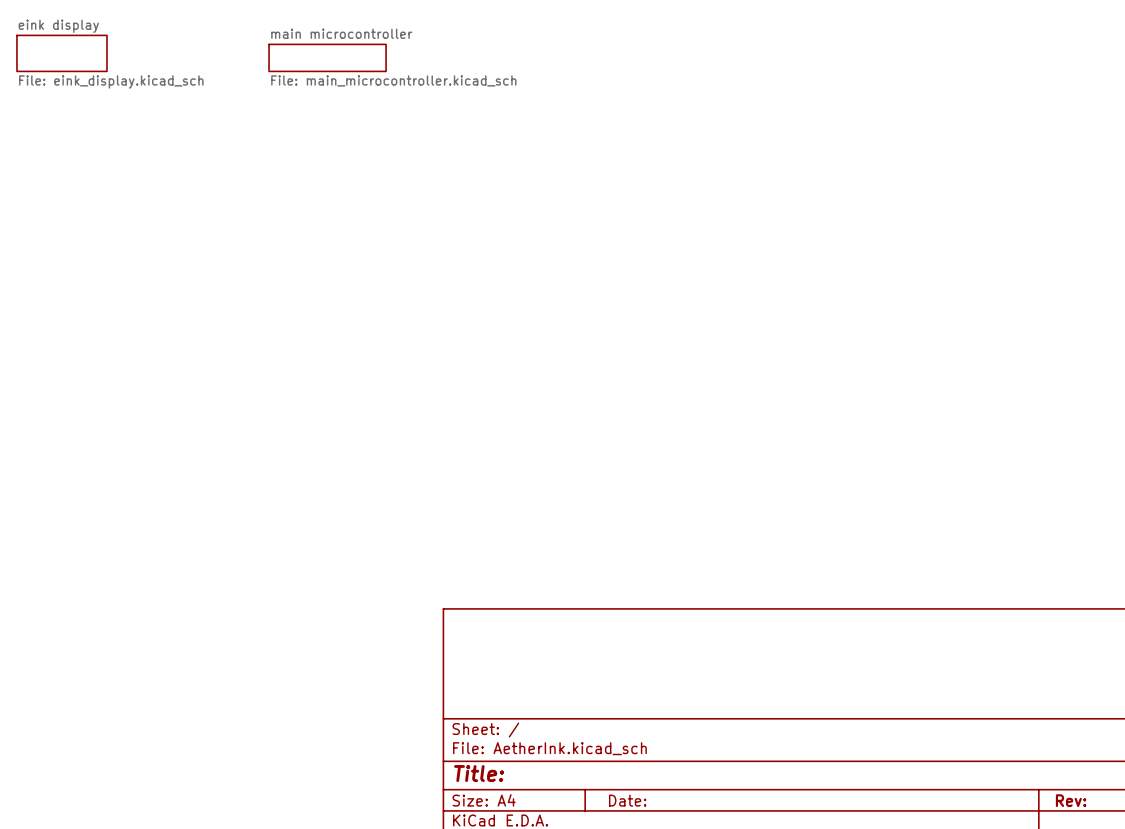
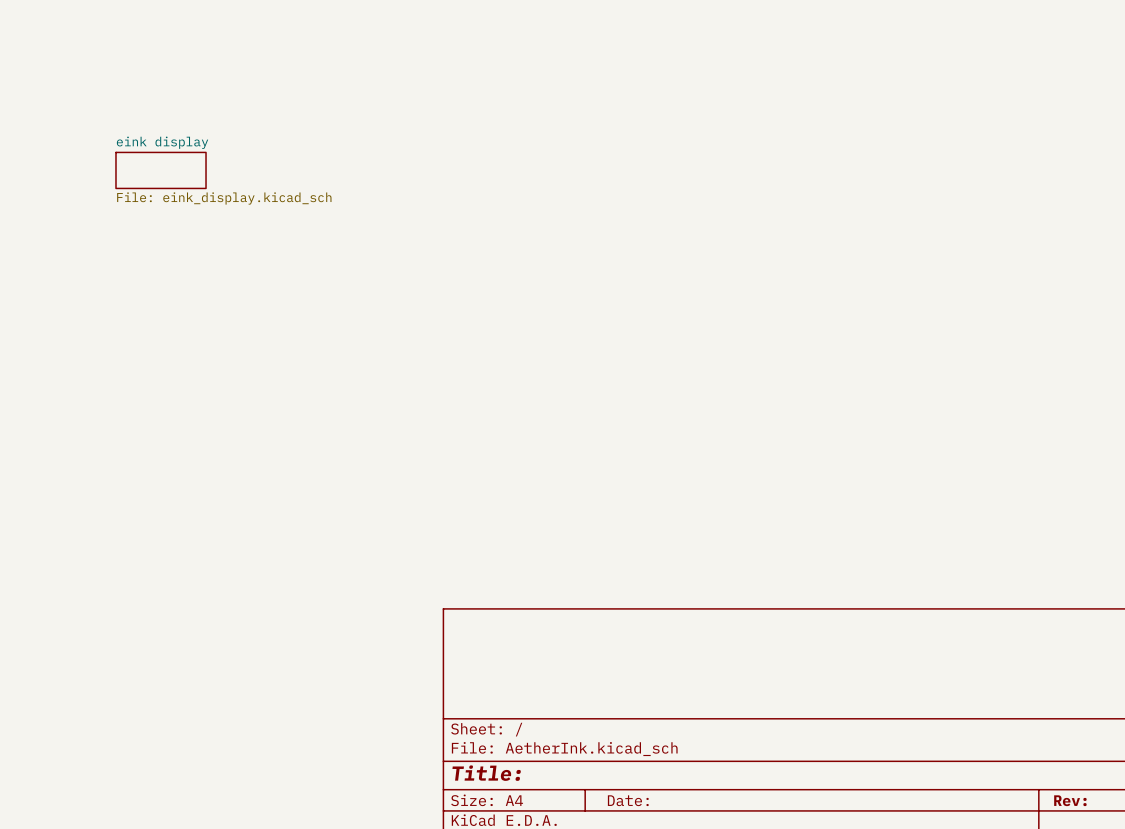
sheet eink display position: (61, 53) -> (161, 170)
sheet main microcontroller: File: main_microcontroller.kicad_sch (327, 57) -> none

